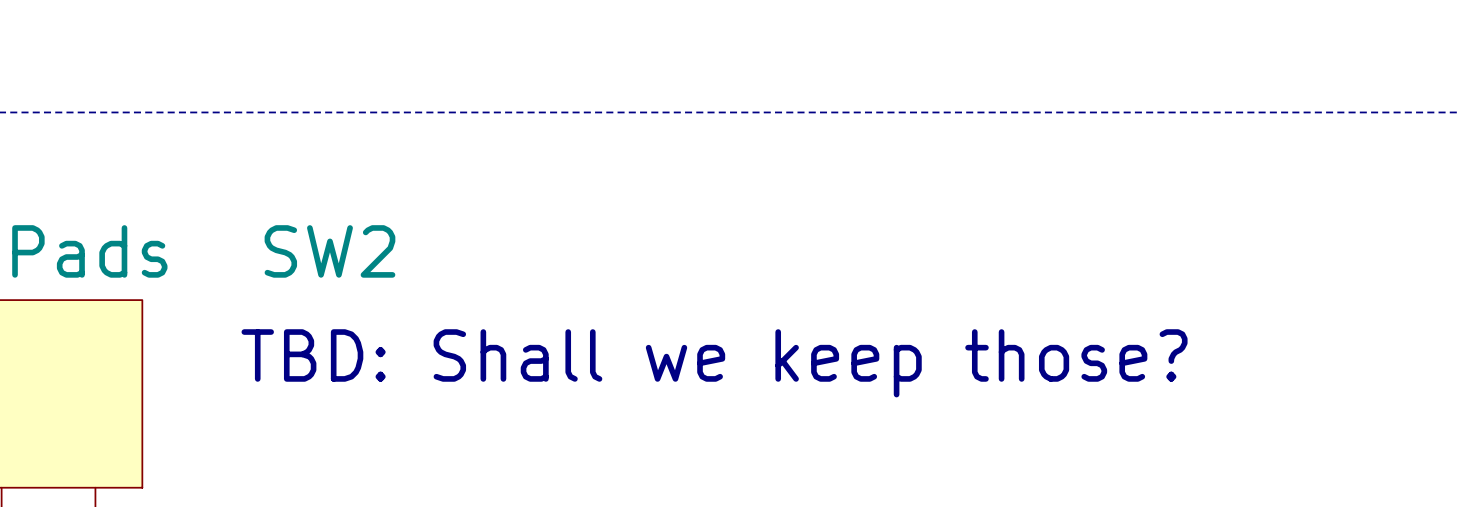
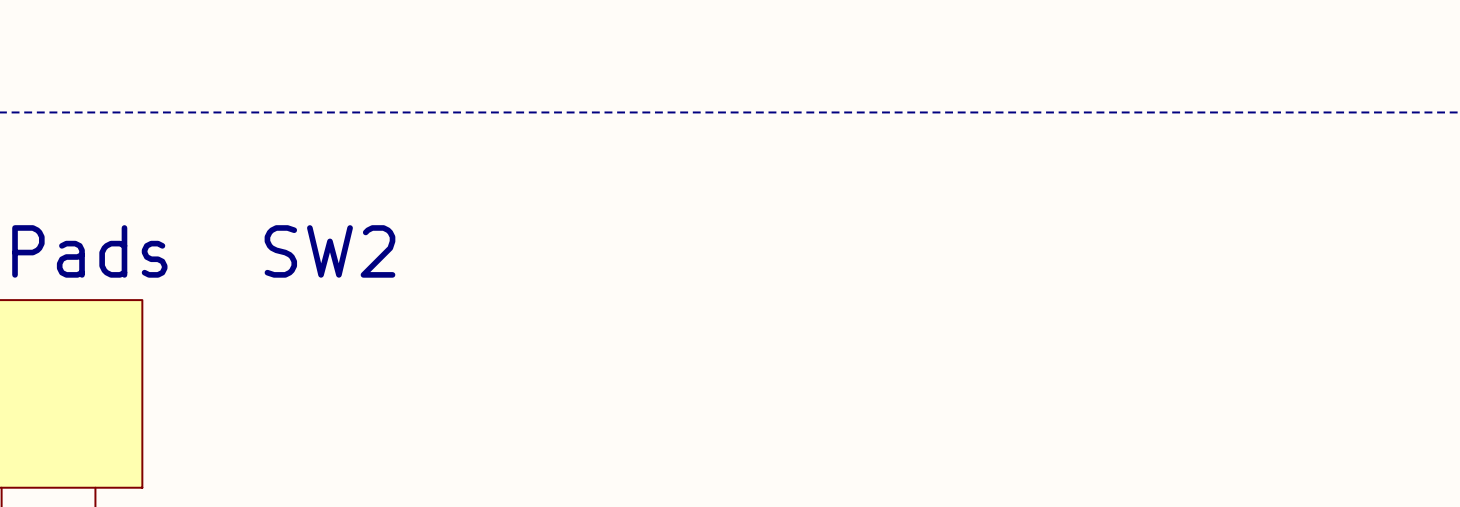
text: TBD: Shall we keep those? (714, 363) -> none

